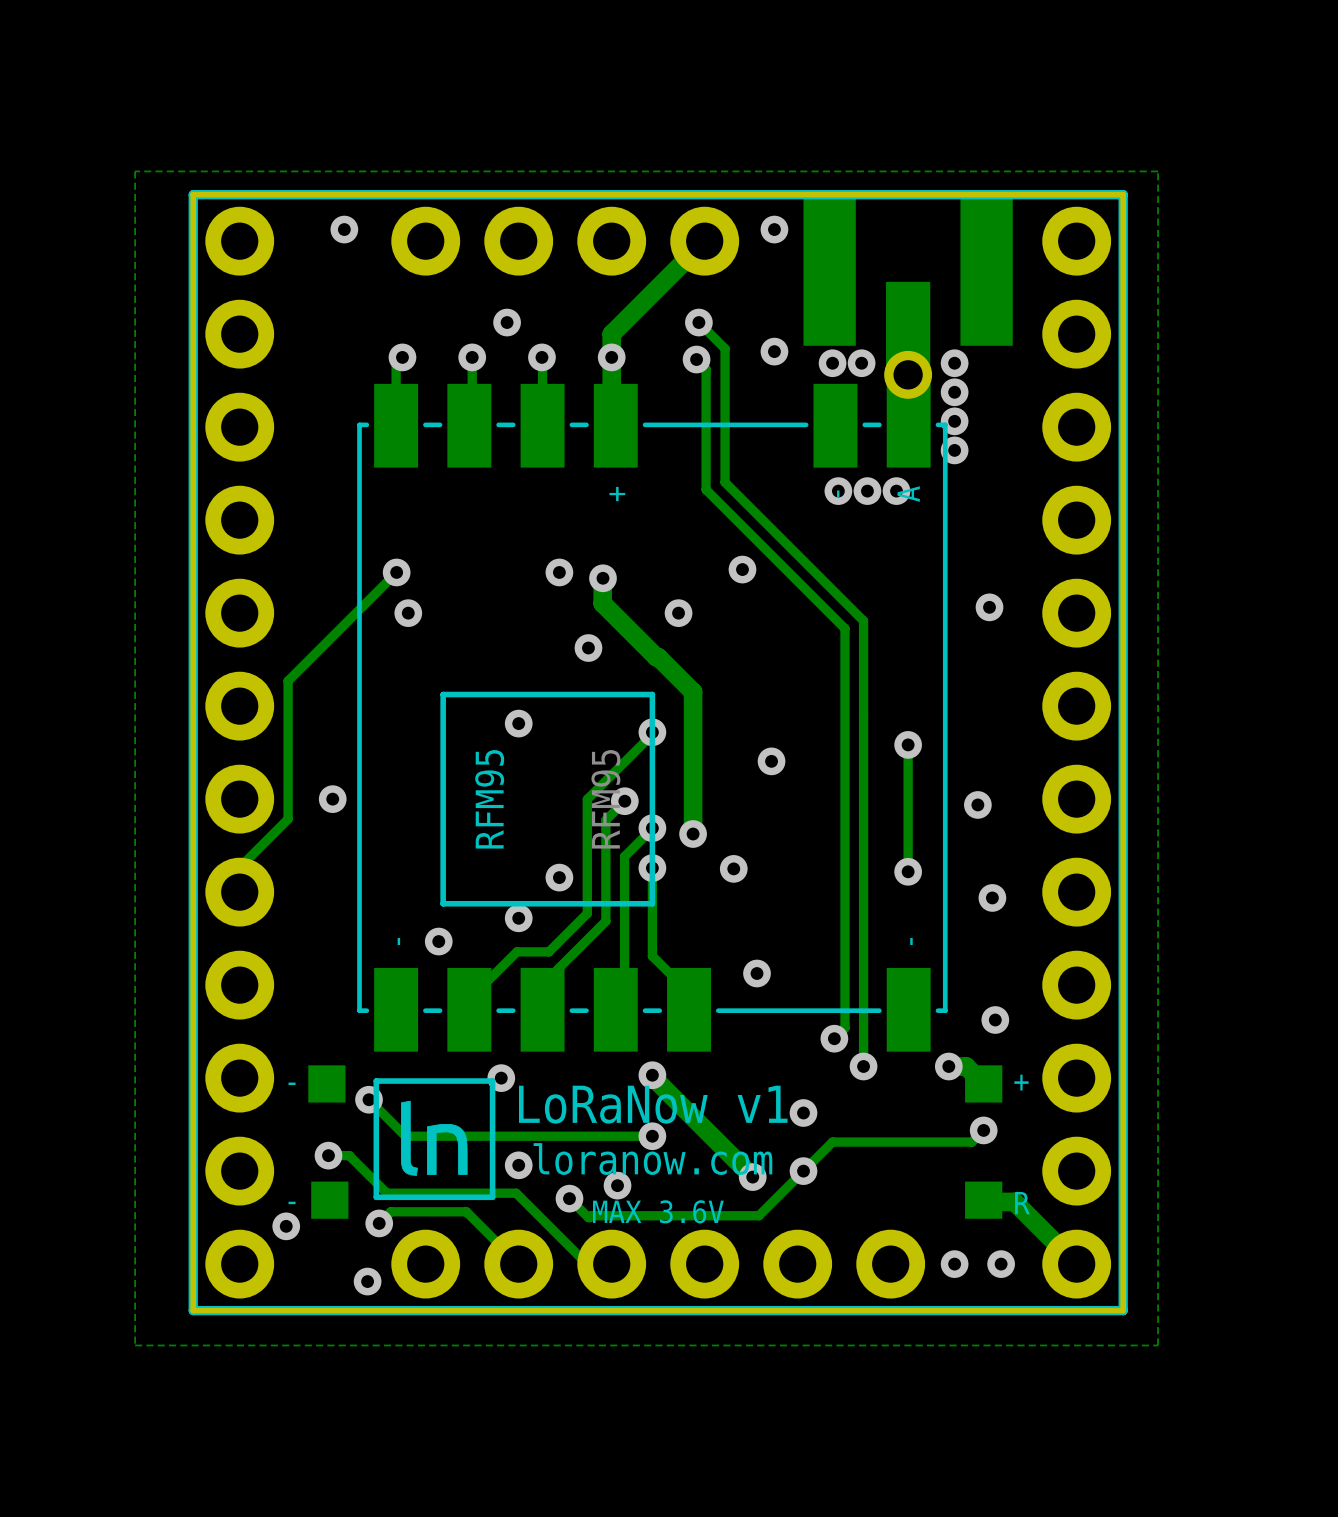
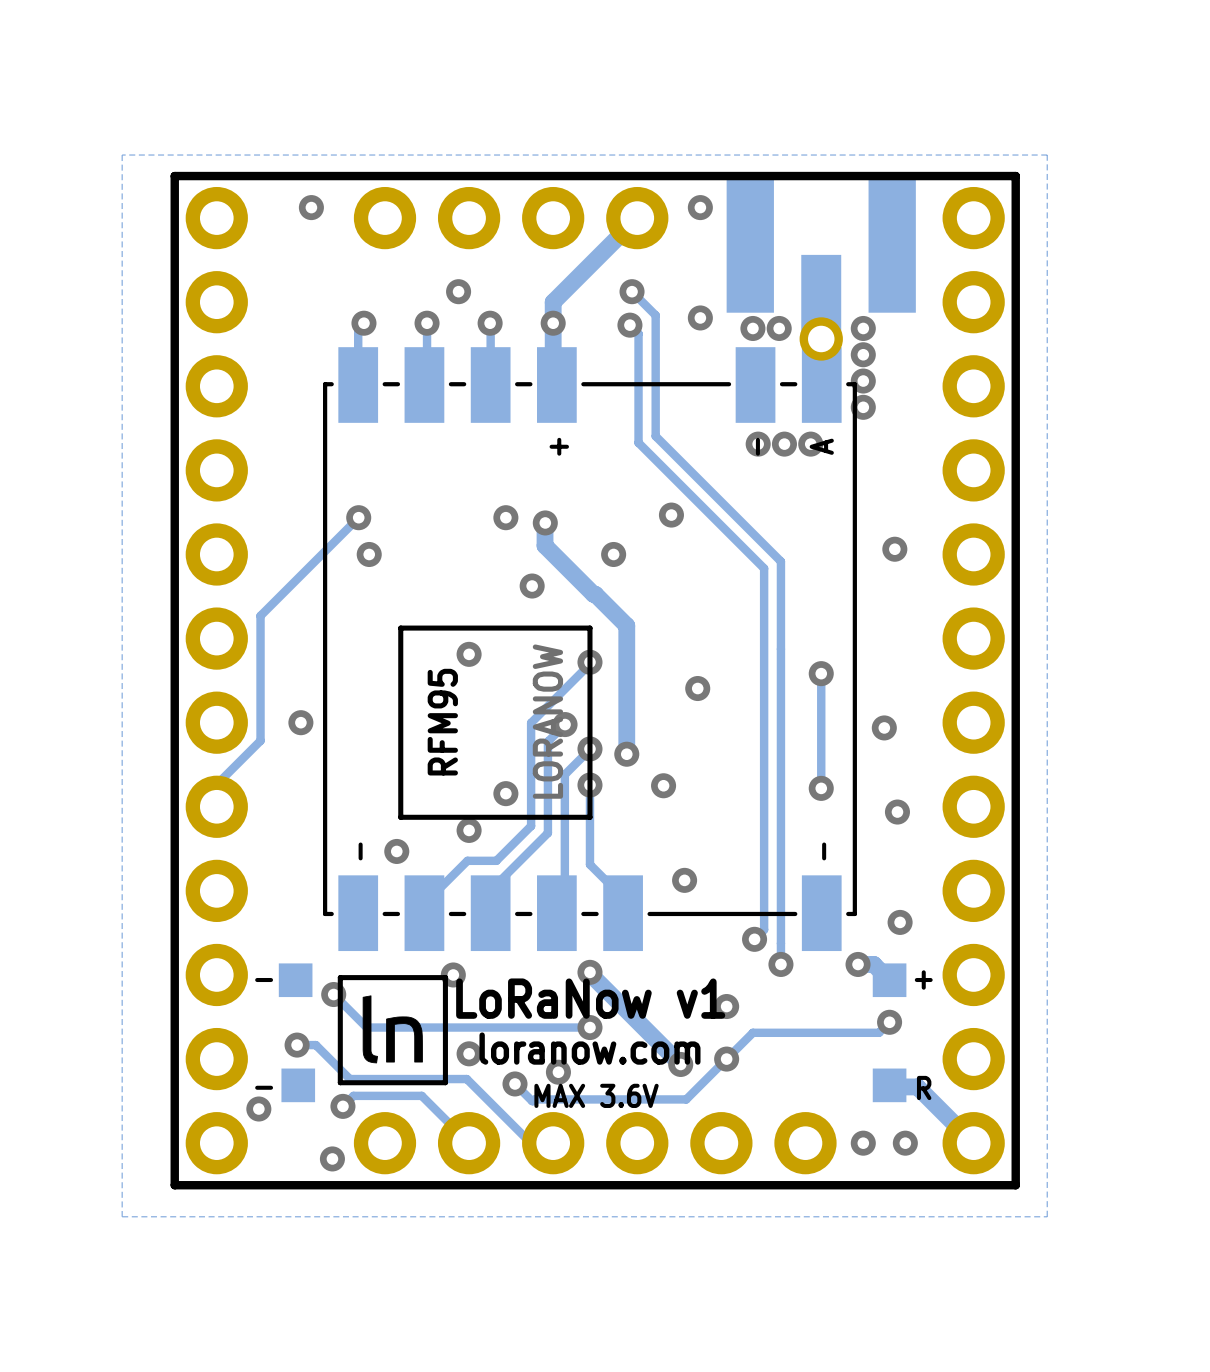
RFM95 value: RFM95 (605, 799) -> LORANOW (547, 721)

